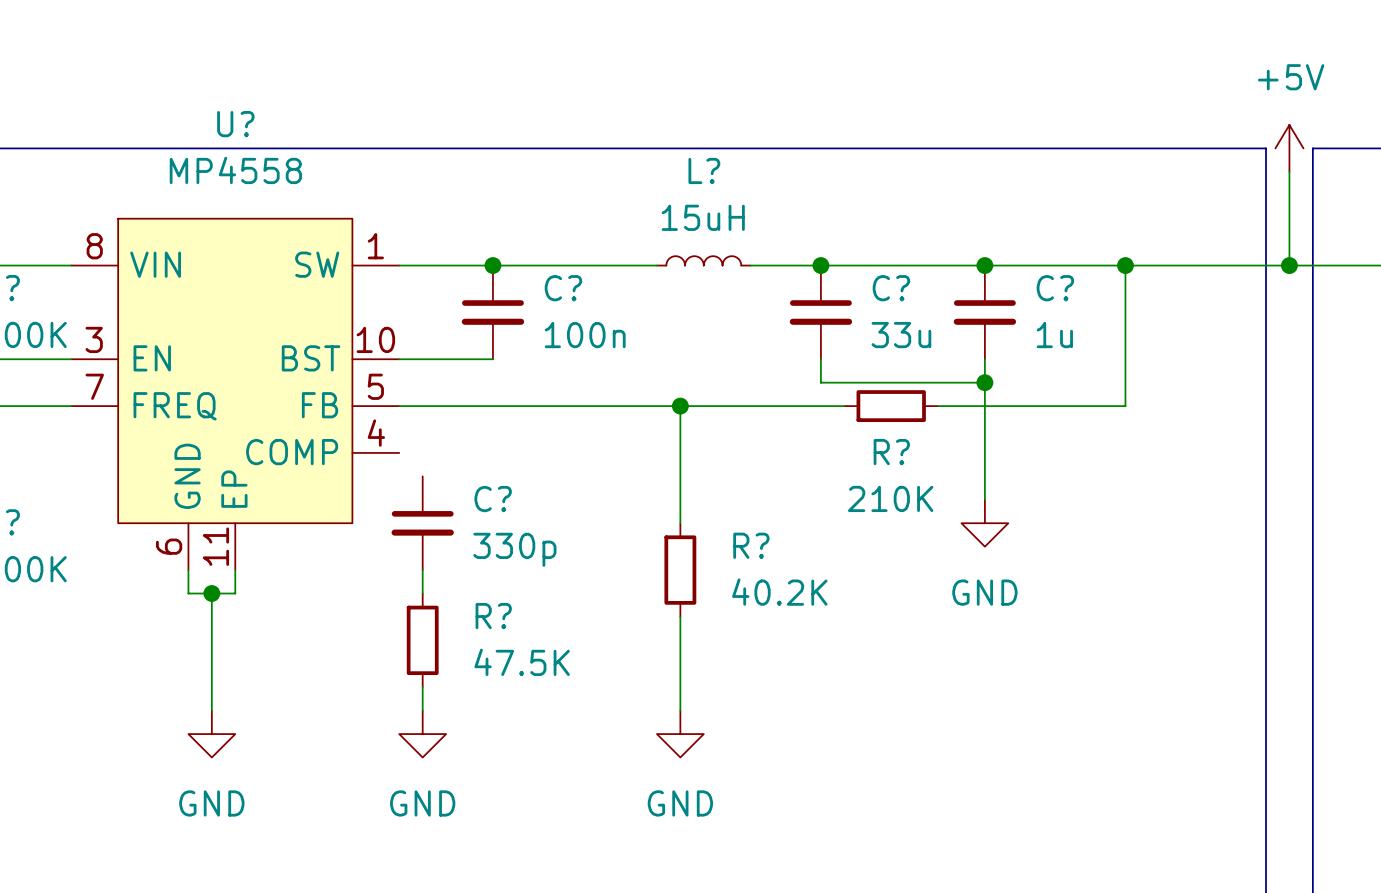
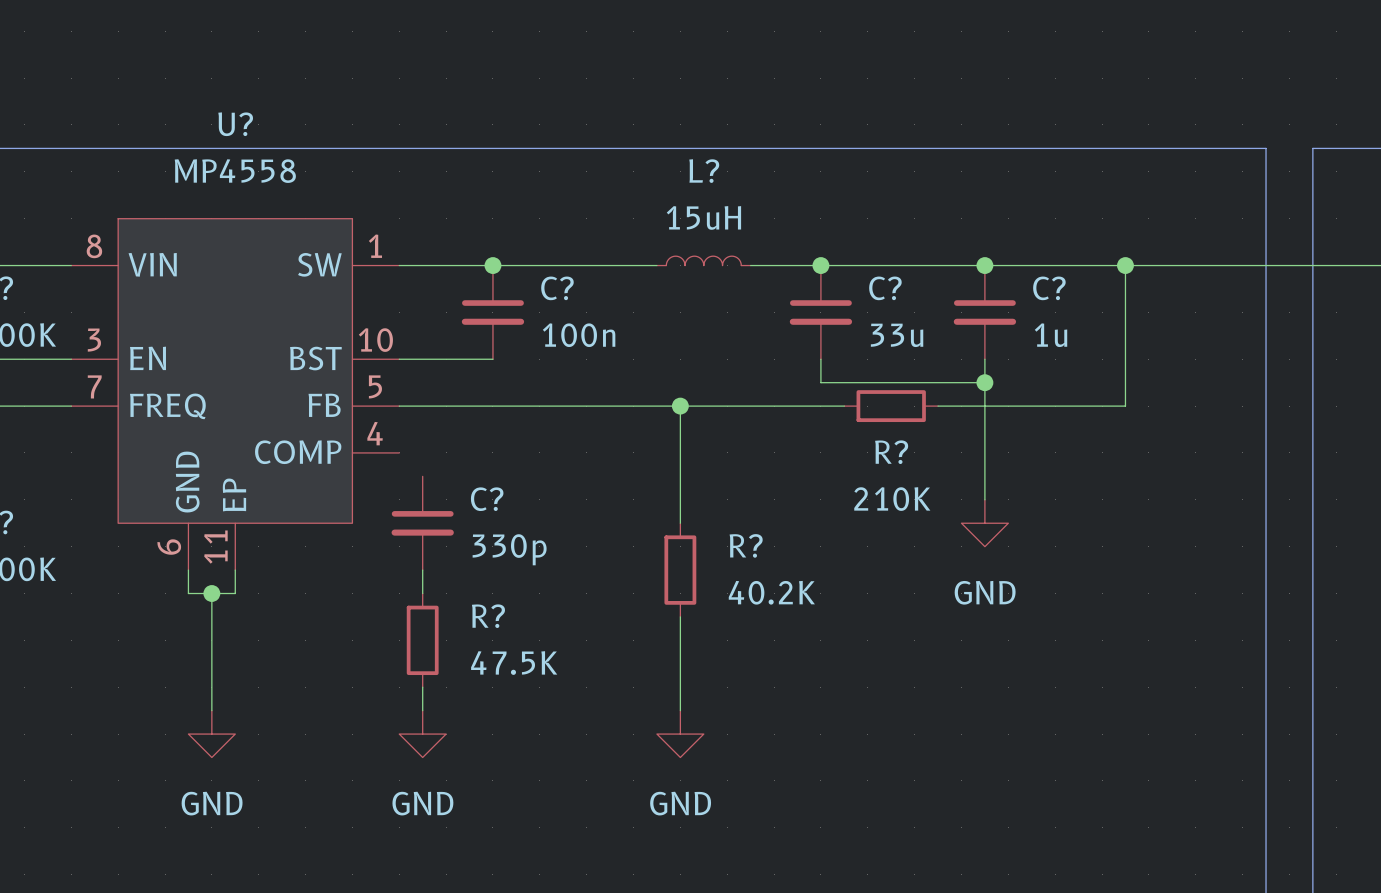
power symbol: +5V (1289, 148) -> none
wire: (1289, 171) (1289, 265) -> none
junction: (1289, 265) -> none

